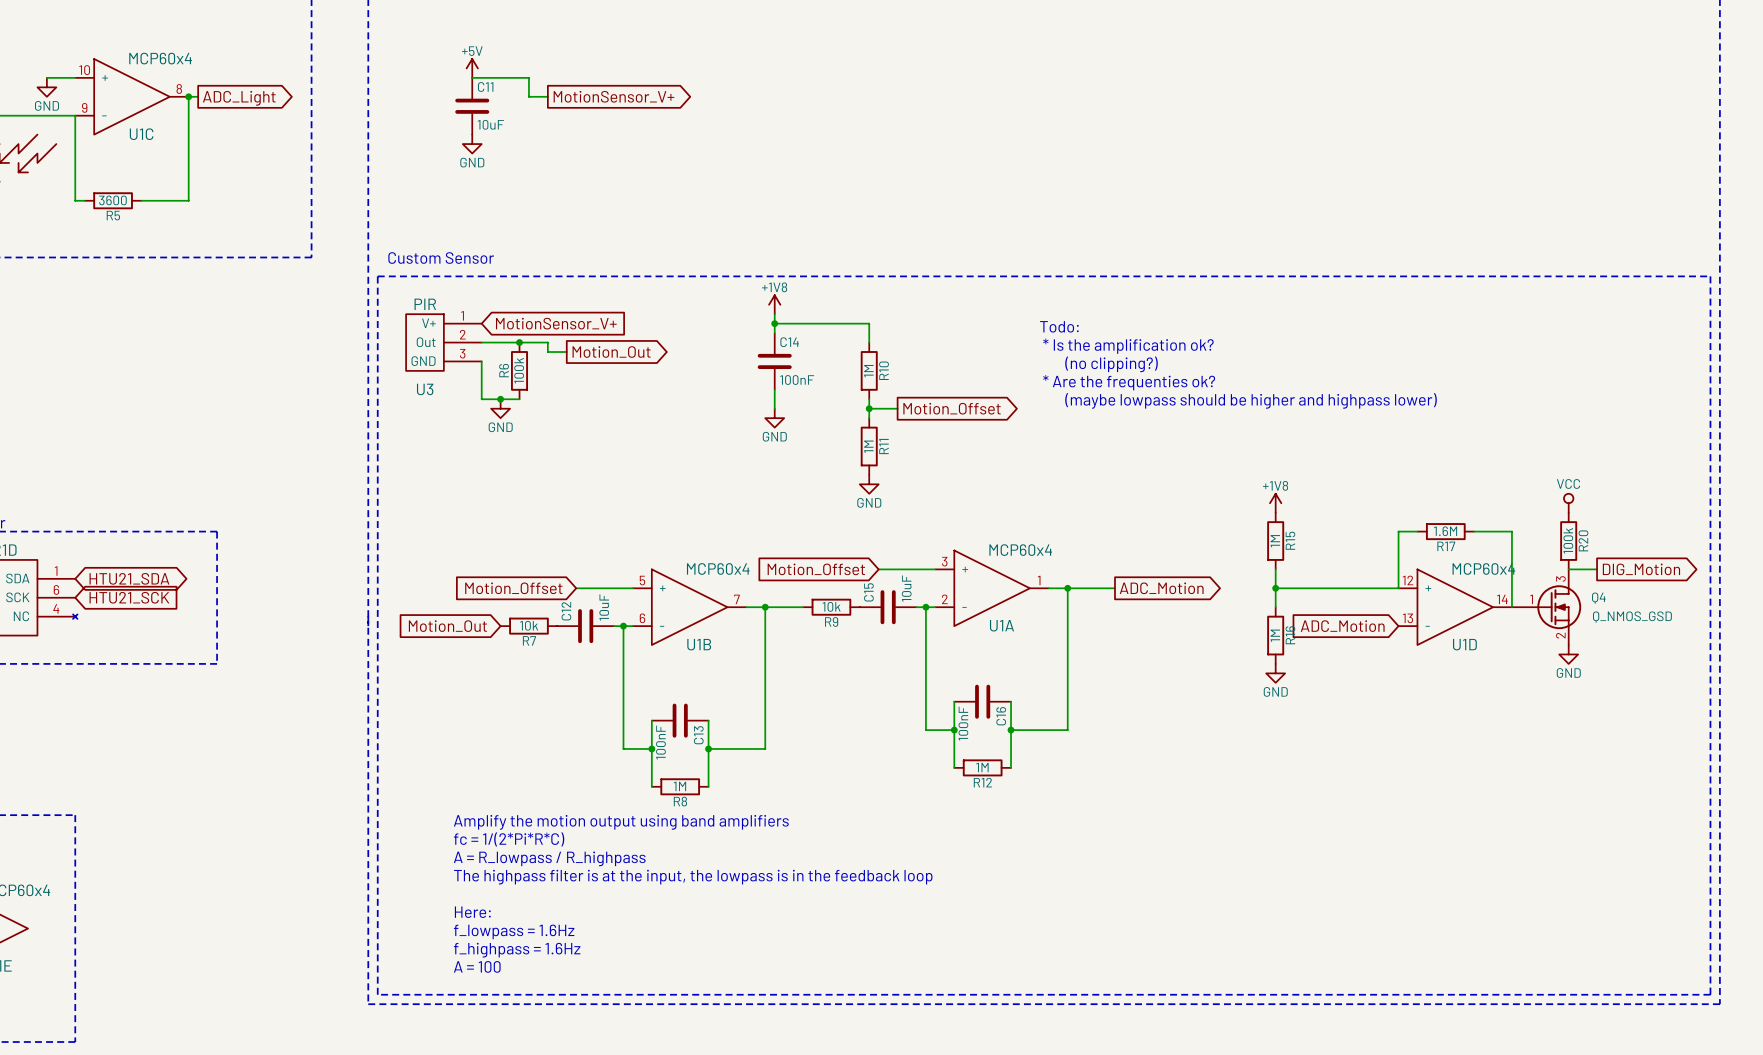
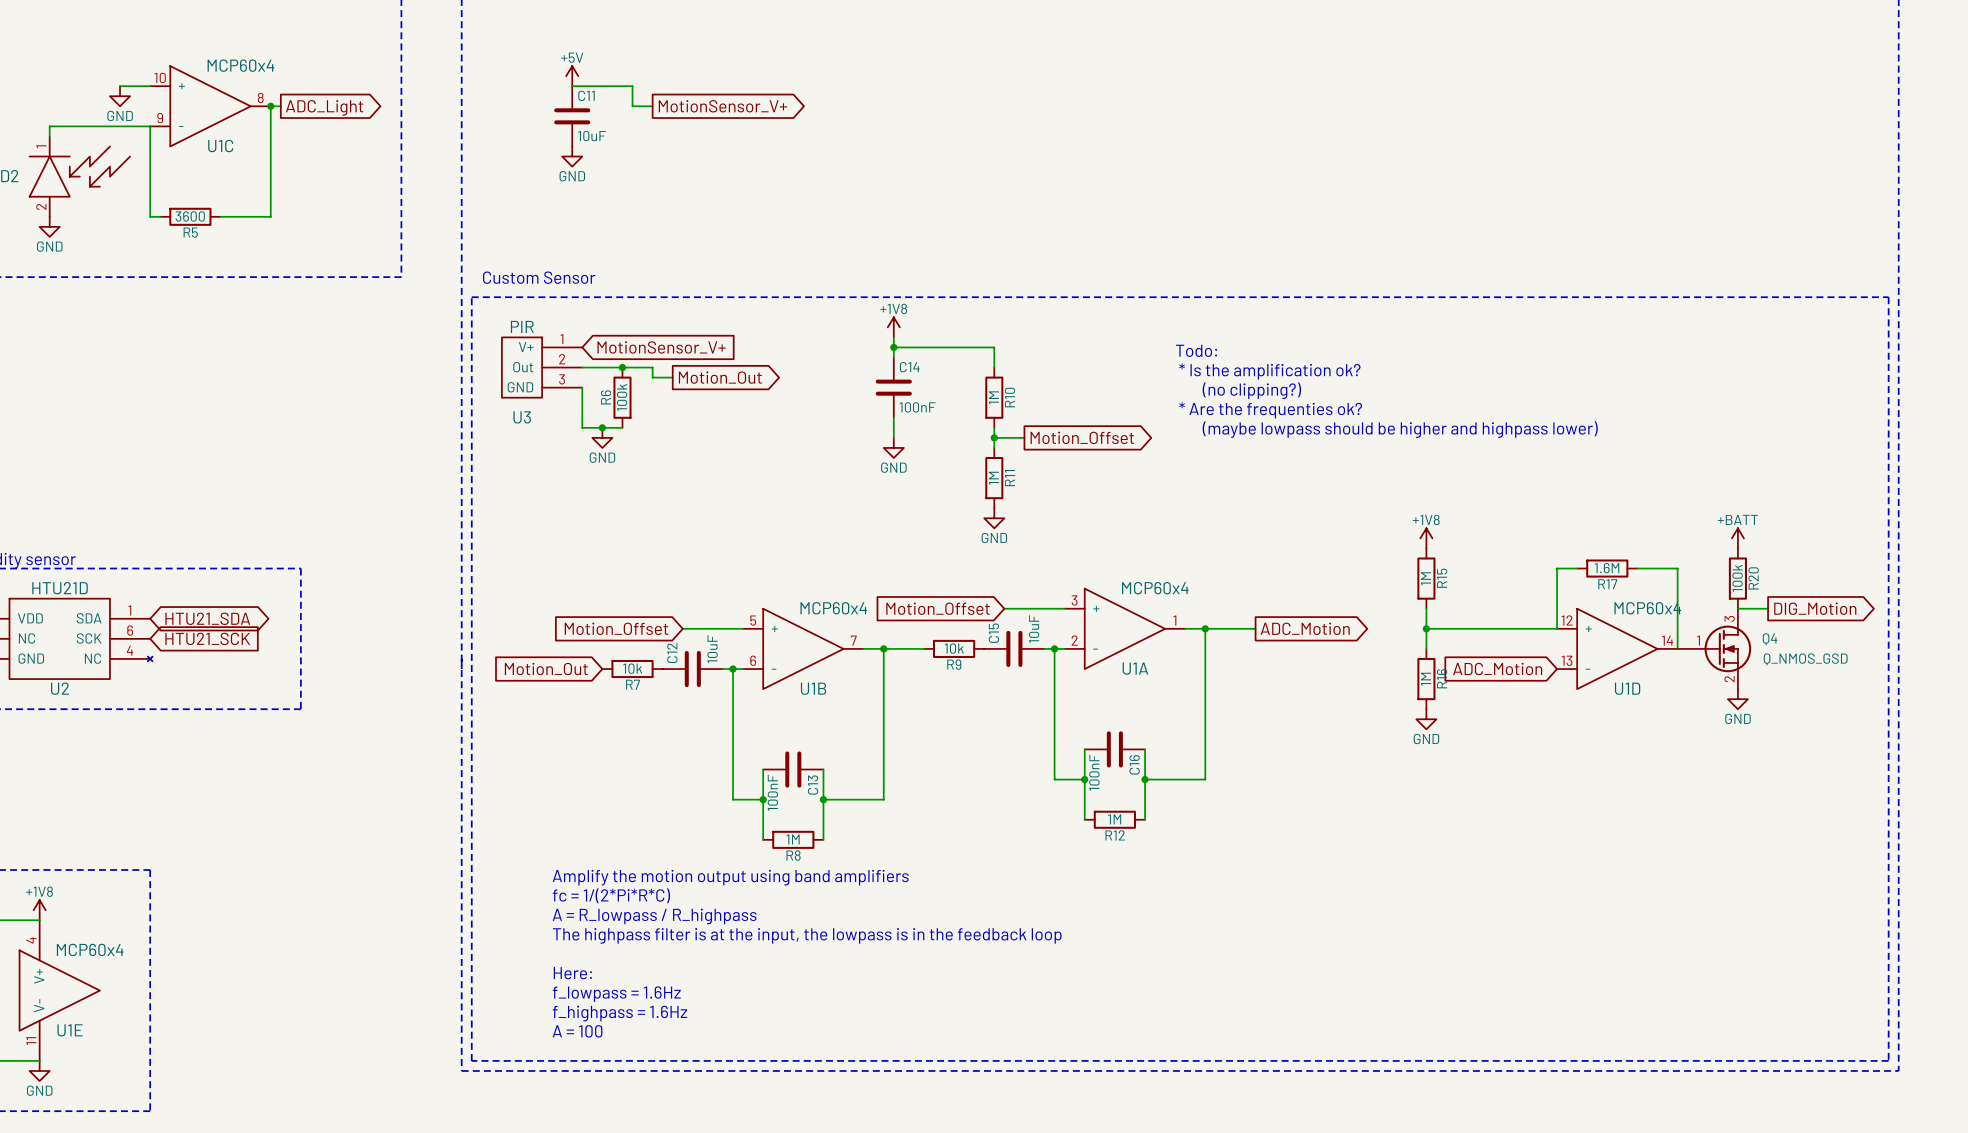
power symbol: VCC (1568, 503) -> +BATT (1737, 538)

